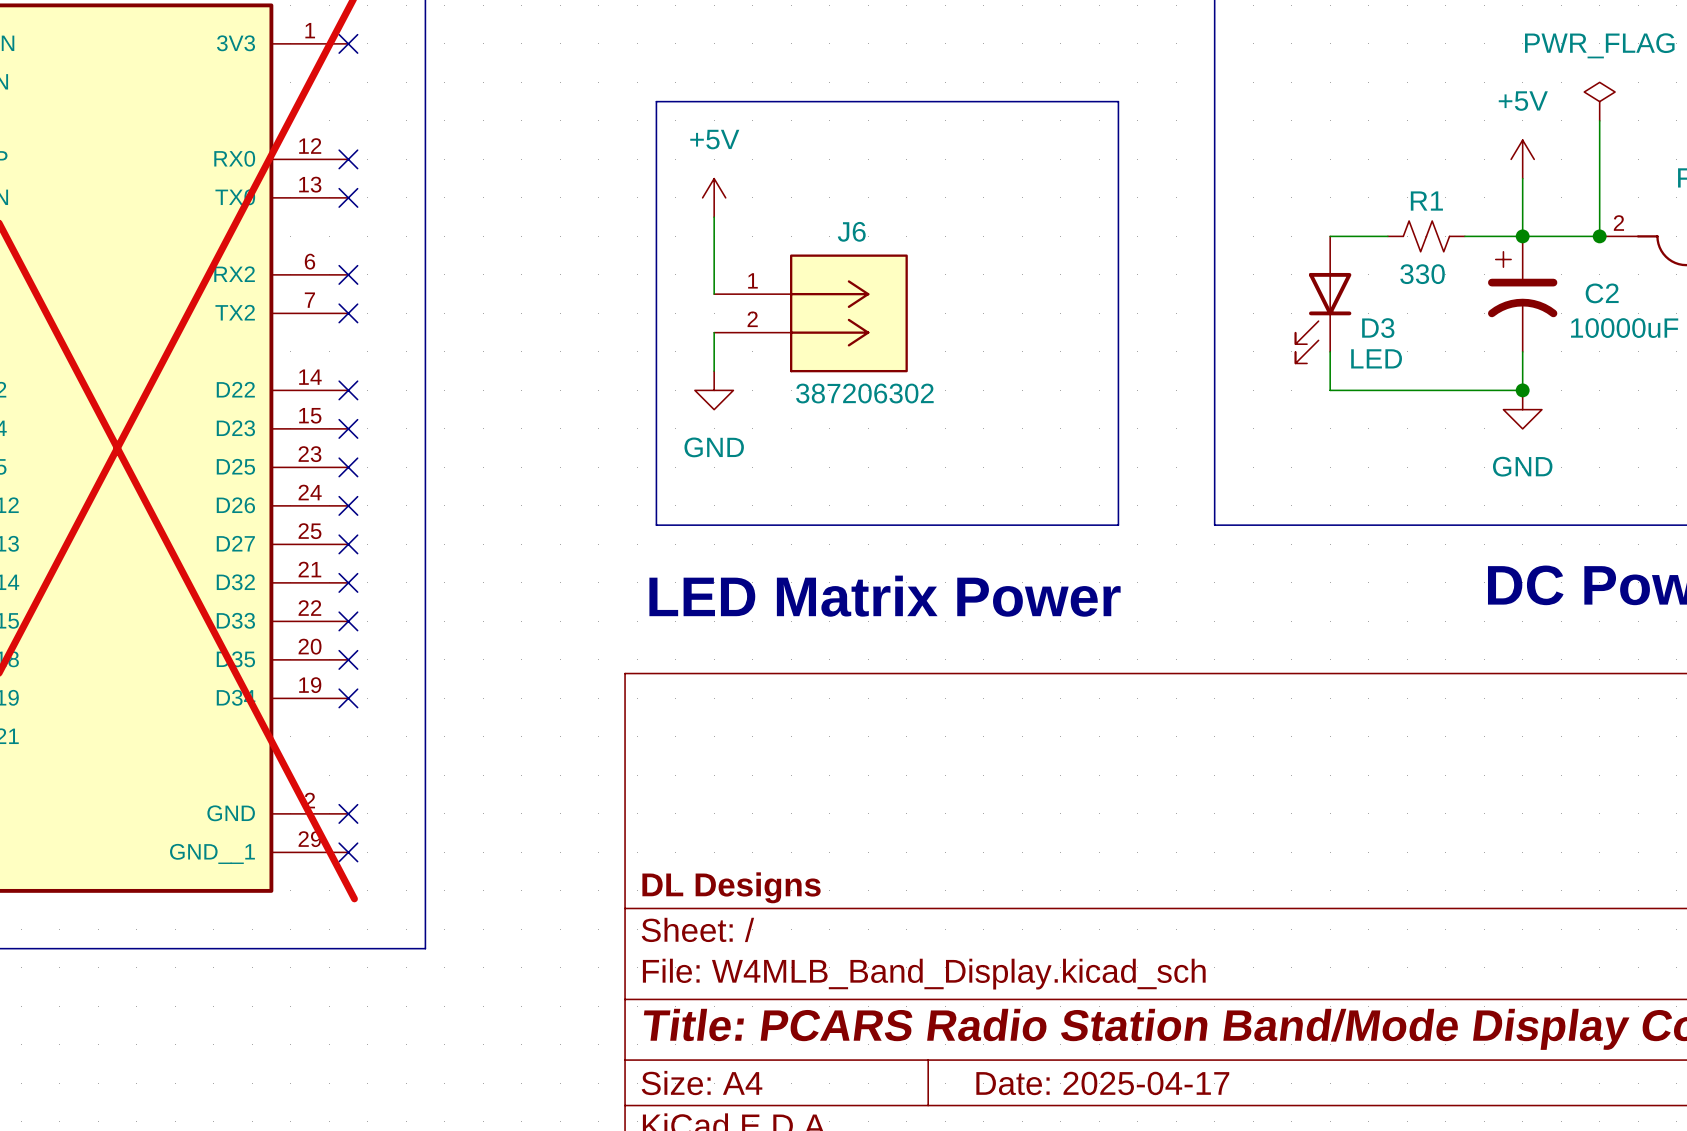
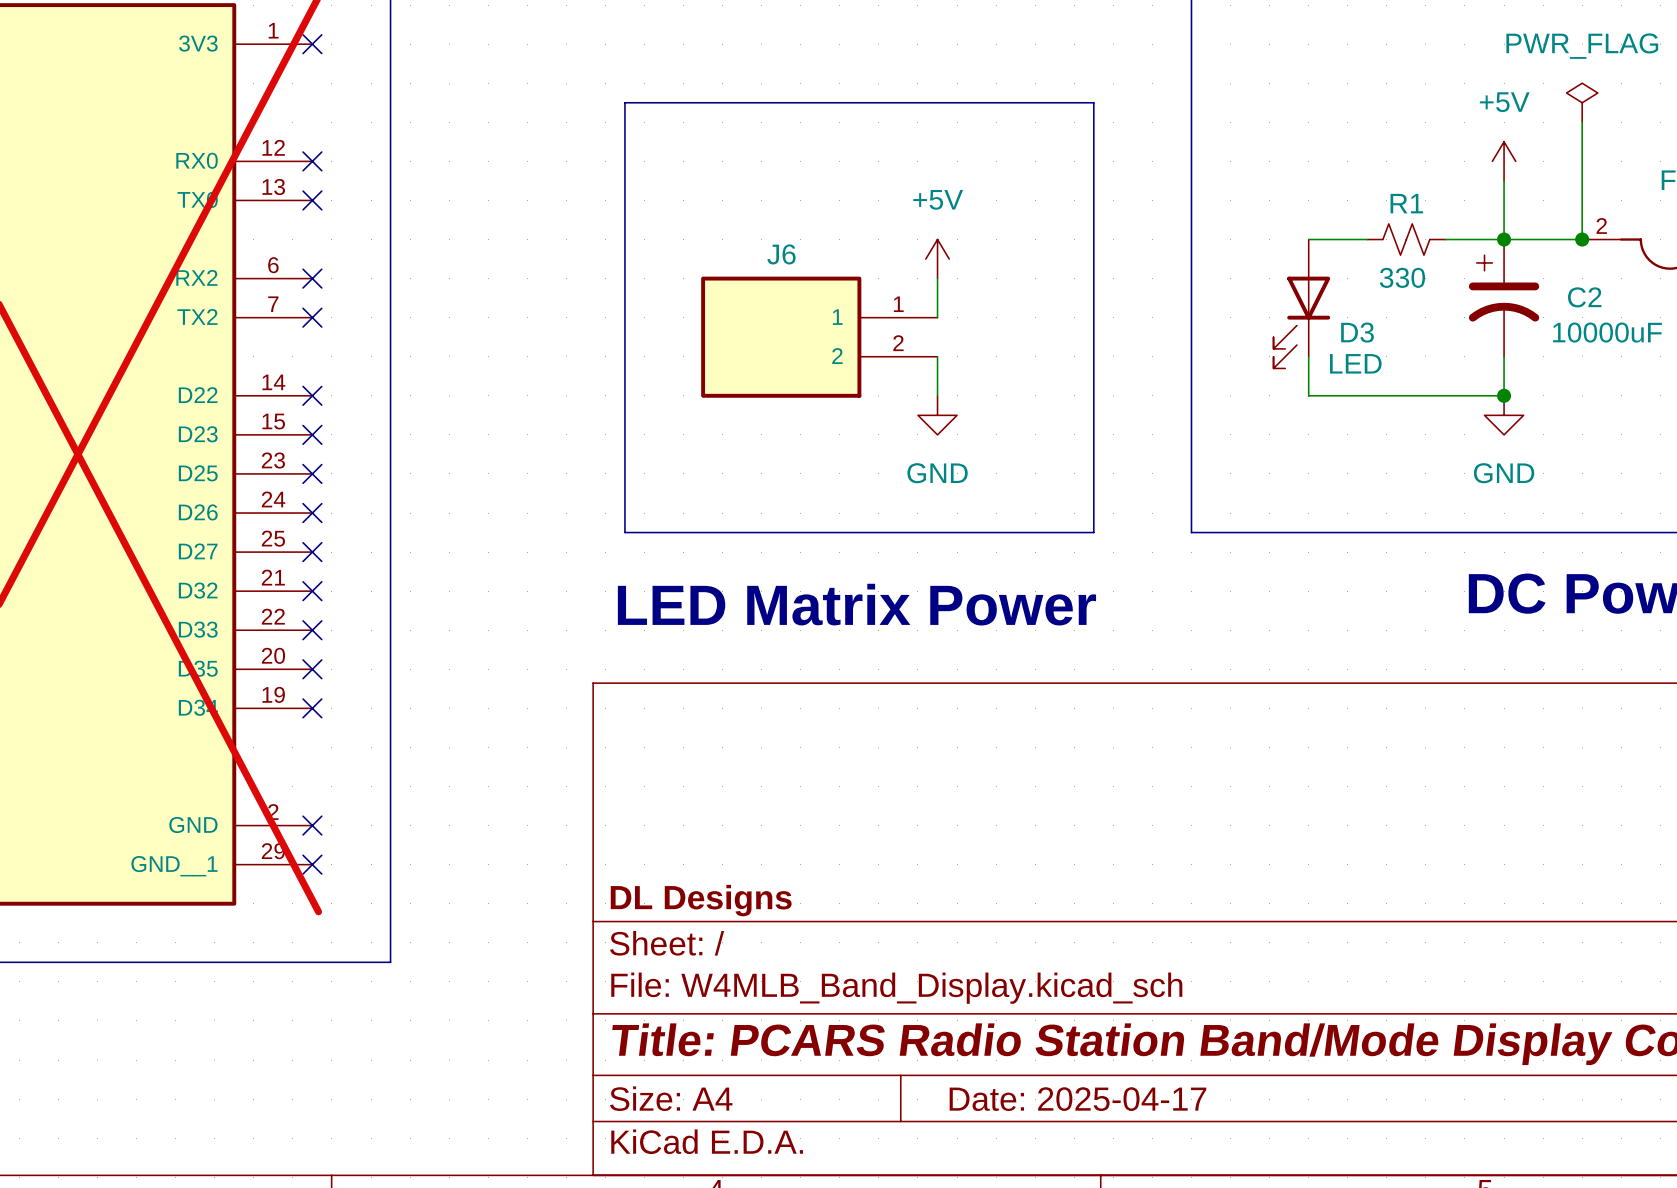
power symbol position: +5V (714, 197) -> +5V (937, 259)
wire: (714, 217) (714, 294) -> none
J6 name position: J6 (851, 231) -> J6 (781, 254)
J6 symbol: [714, 254, 908, 373] -> [701, 276, 938, 398]
wire: none -> (937, 278) (937, 317)
wire: (714, 332) (714, 371) -> (937, 356) (937, 395)
power symbol position: GND (714, 390) -> GND (937, 415)
J6 value: 387206302 (864, 393) -> none

